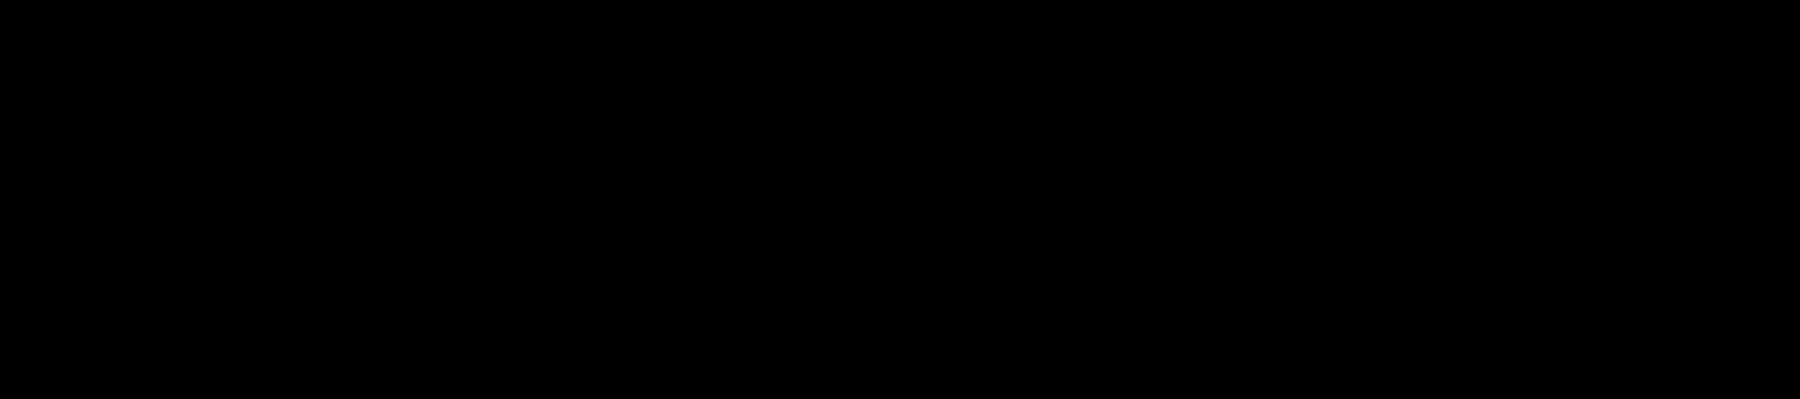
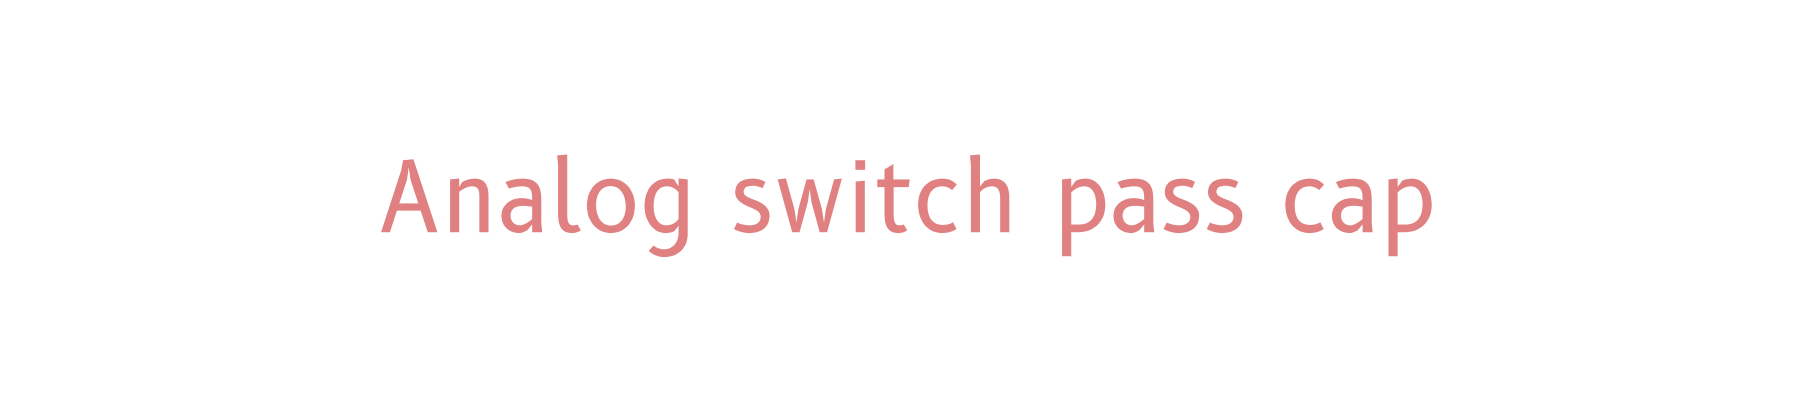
text: none -> Analog switch pass cap (906, 205)

